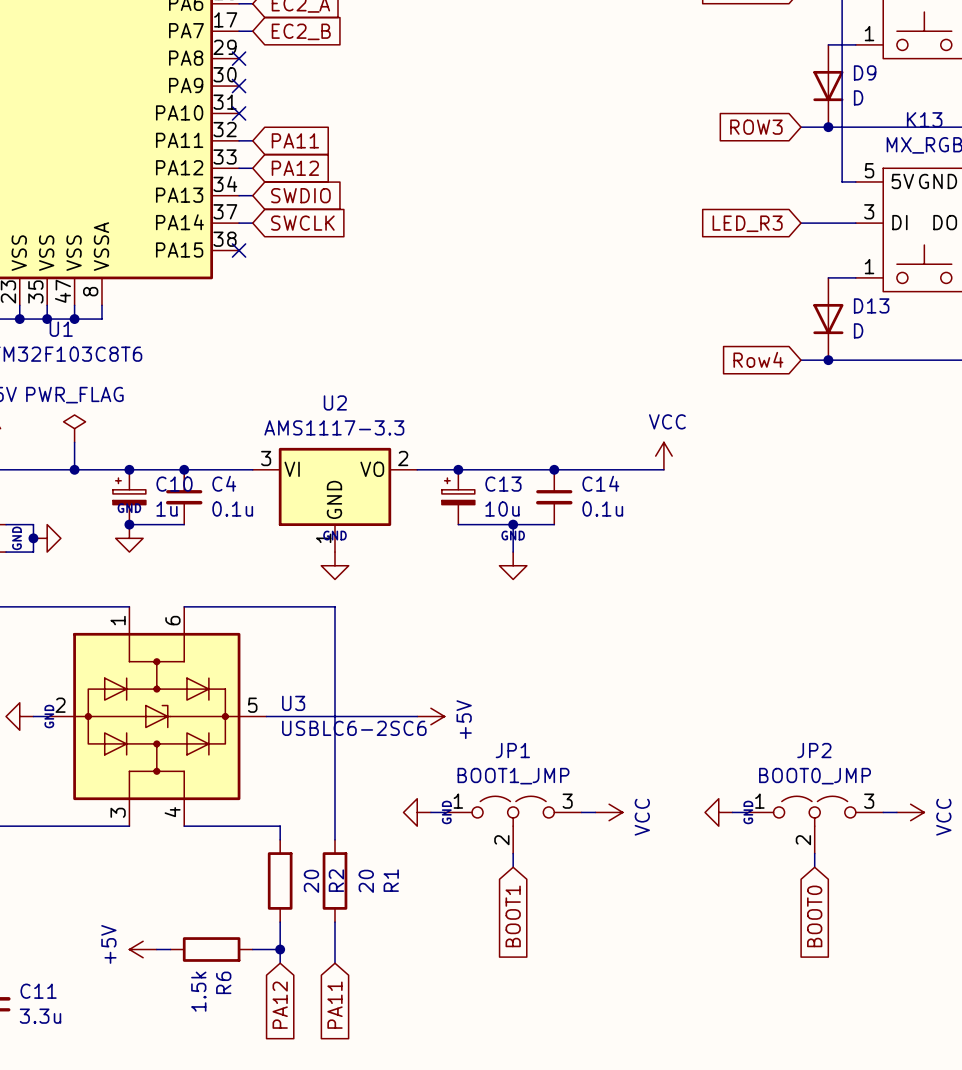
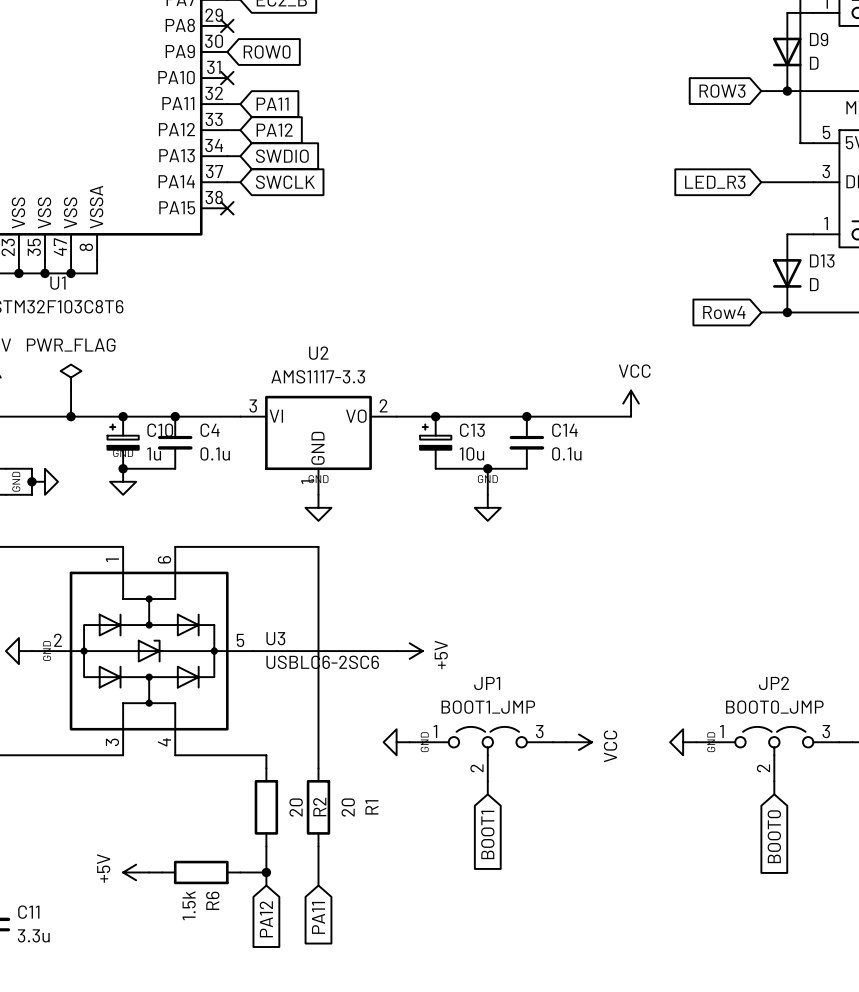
no-connect mark: (239, 86) -> none
global label: none -> ROW0 (267, 52)

